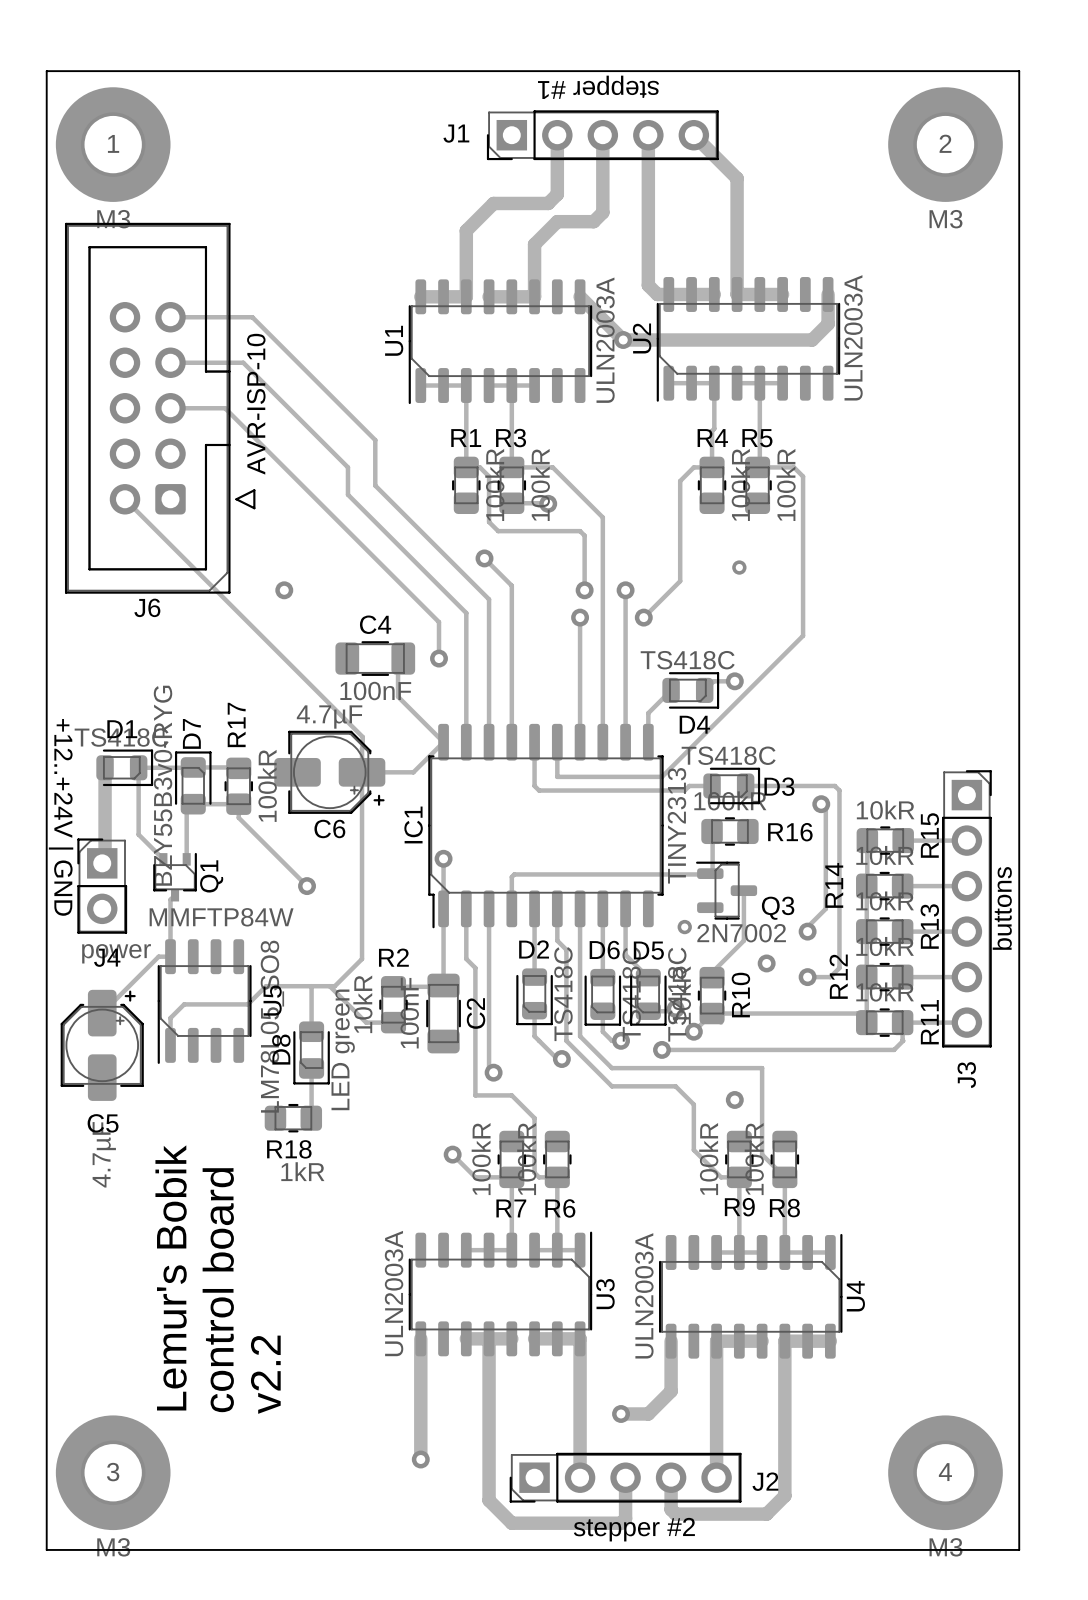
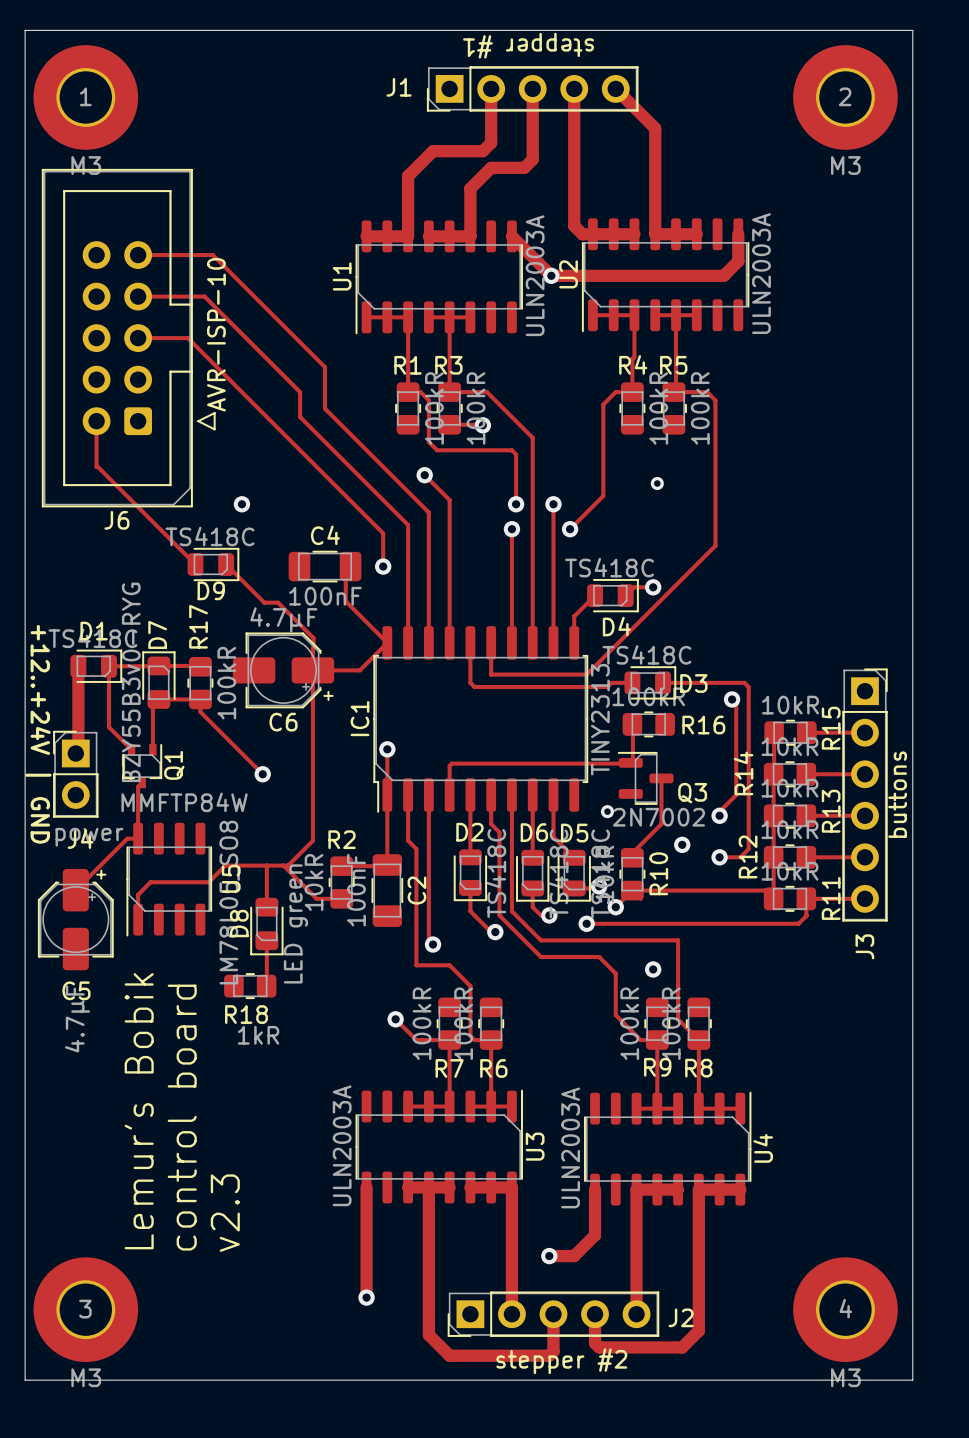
track: (124, 499) (323, 698) -> (96, 421) (96, 466) (195, 564)
D9: none -> TS418C (213, 564)
track: none -> (226, 564) (264, 602) (278, 602)
text: v2.2 (265, 1374) -> v2.3 (225, 1213)

